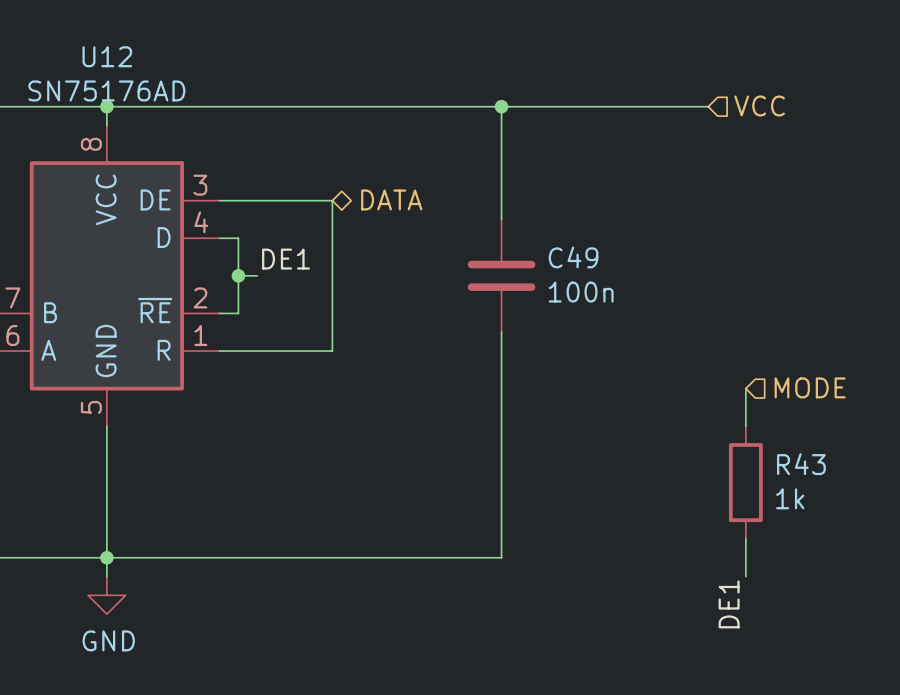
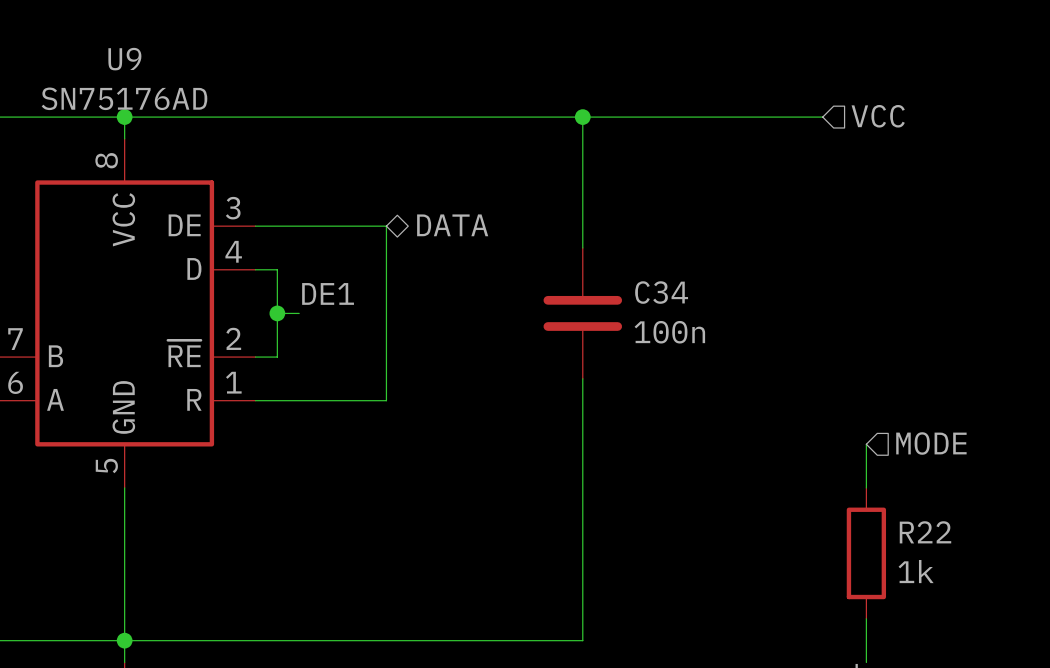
U12 name: U12 (107, 56) -> U9 (124, 59)
C49 name: C49 (573, 257) -> C34 (661, 292)
R43 name: R43 (801, 464) -> R22 (925, 532)

